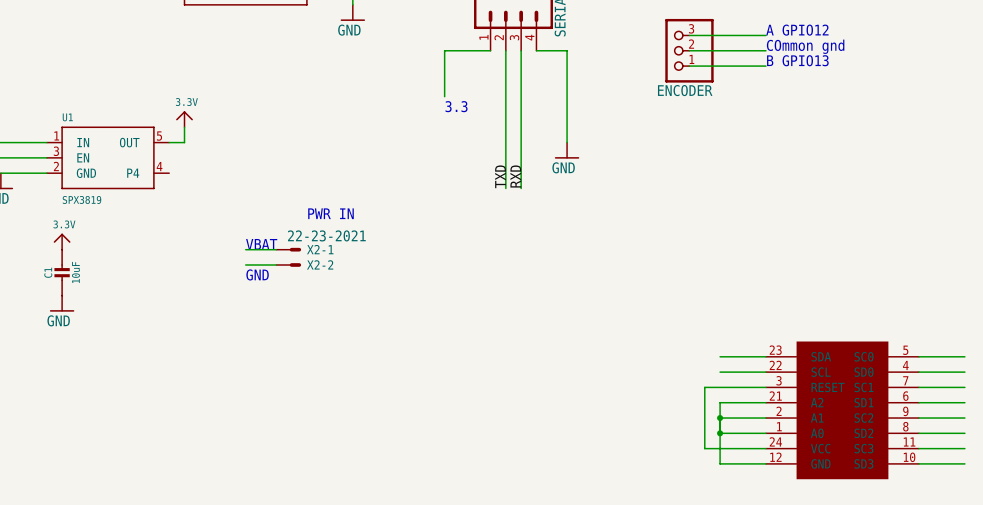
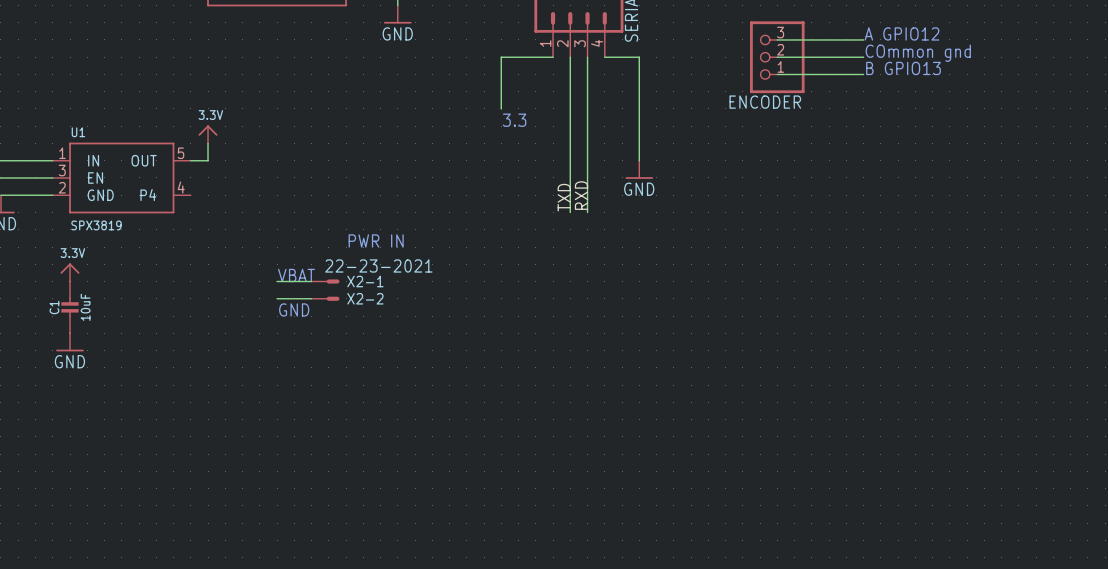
wire: (720, 356) (765, 356) -> none
wire: (919, 356) (964, 356) -> none
wire: (720, 372) (765, 372) -> none
wire: (919, 372) (964, 372) -> none
wire: (765, 387) (704, 387) (704, 448) (765, 448) -> none
wire: (919, 387) (964, 387) -> none
wire: (765, 402) (720, 402) (720, 463) (765, 463) -> none
wire: (919, 402) (964, 402) -> none
part: (842, 410) -> none
wire: (720, 418) (765, 418) -> none
junction: (720, 418) -> none
wire: (919, 418) (964, 418) -> none
wire: (720, 433) (765, 433) -> none
junction: (720, 433) -> none
wire: (919, 433) (964, 433) -> none
wire: (919, 448) (964, 448) -> none
wire: (919, 463) (964, 463) -> none

